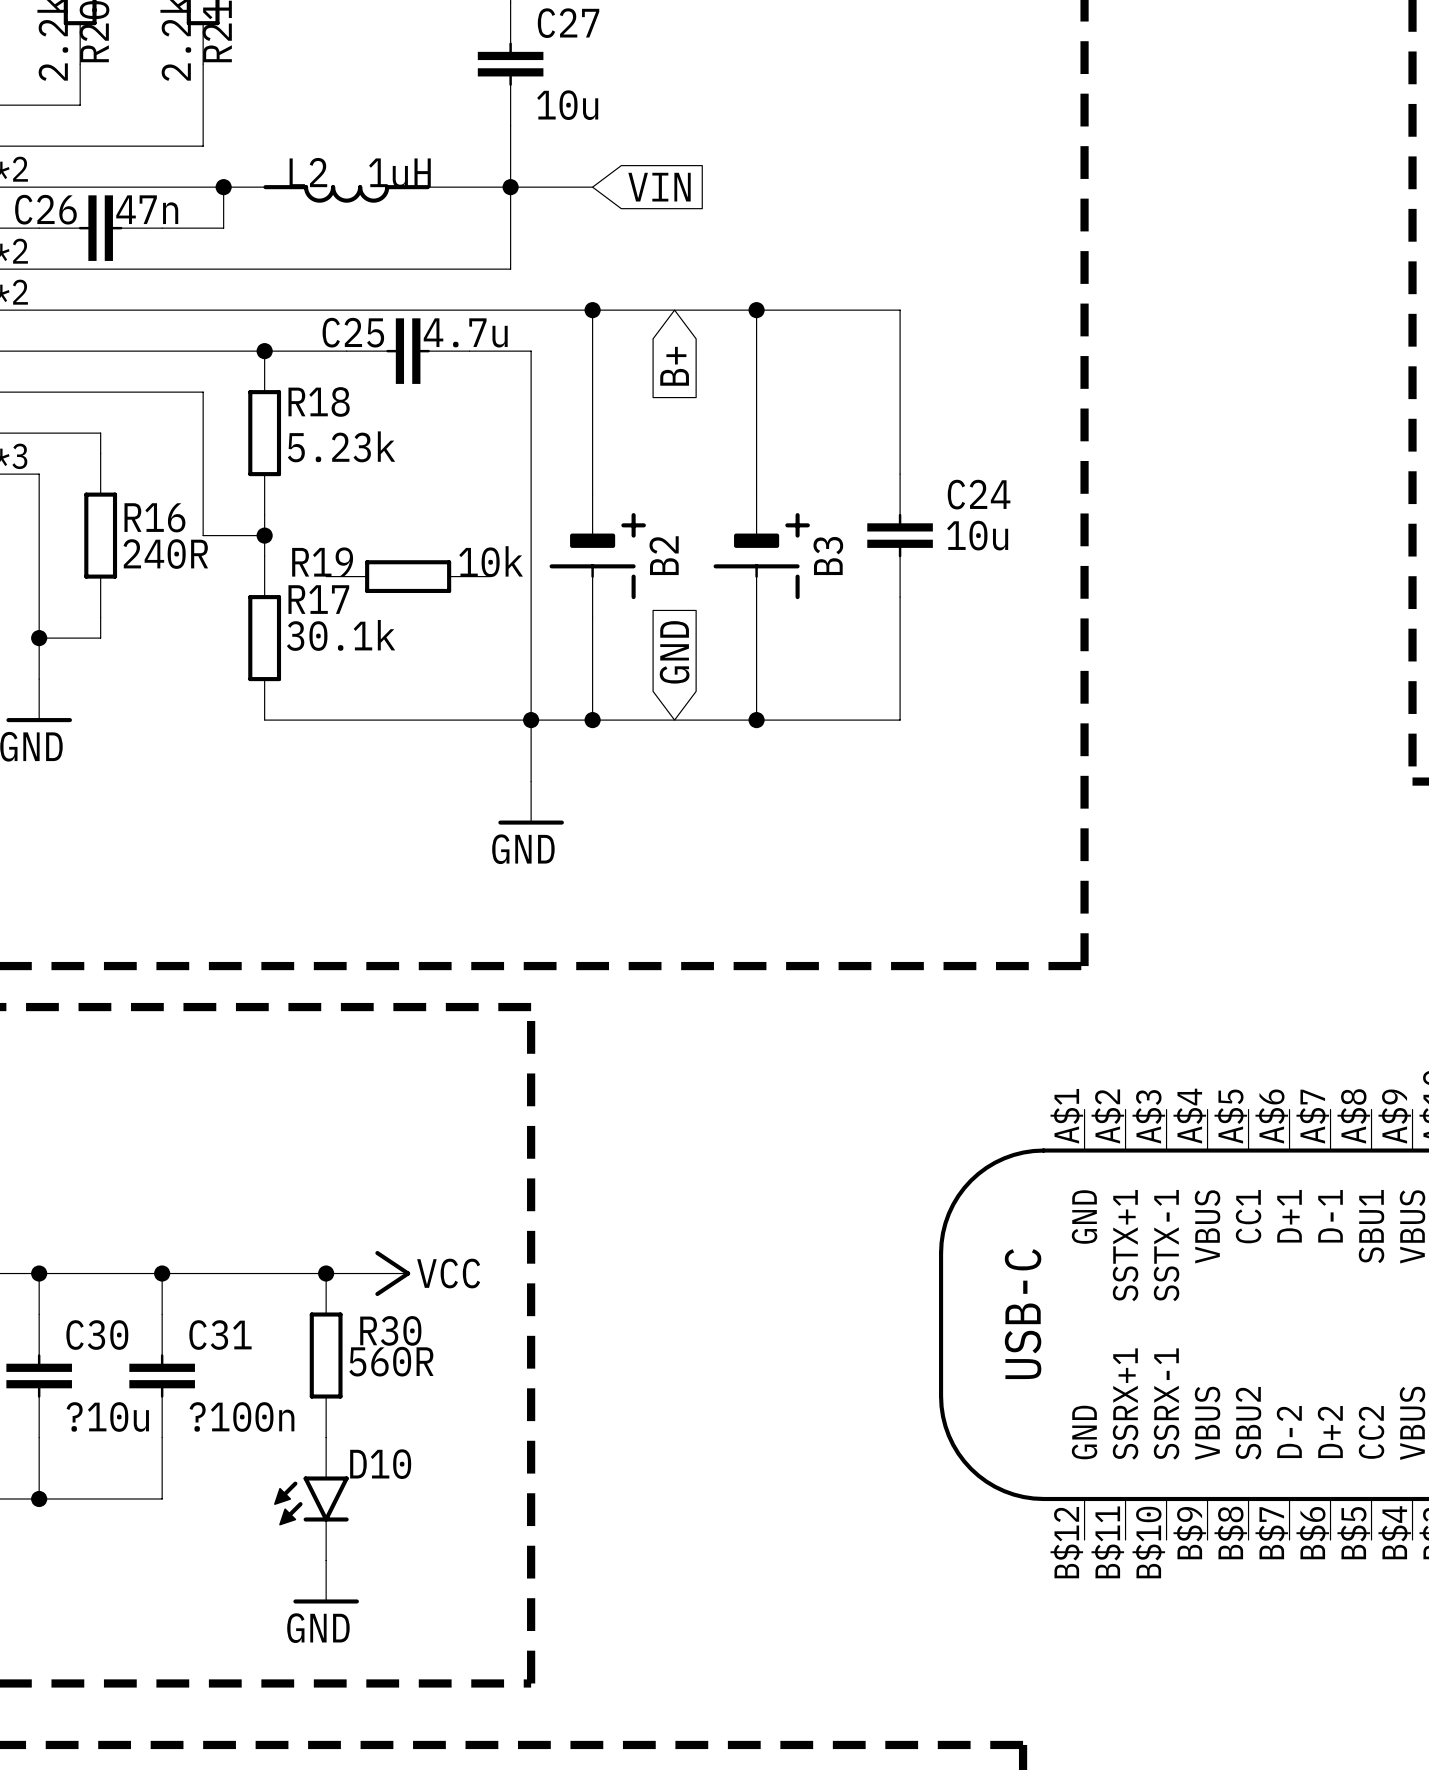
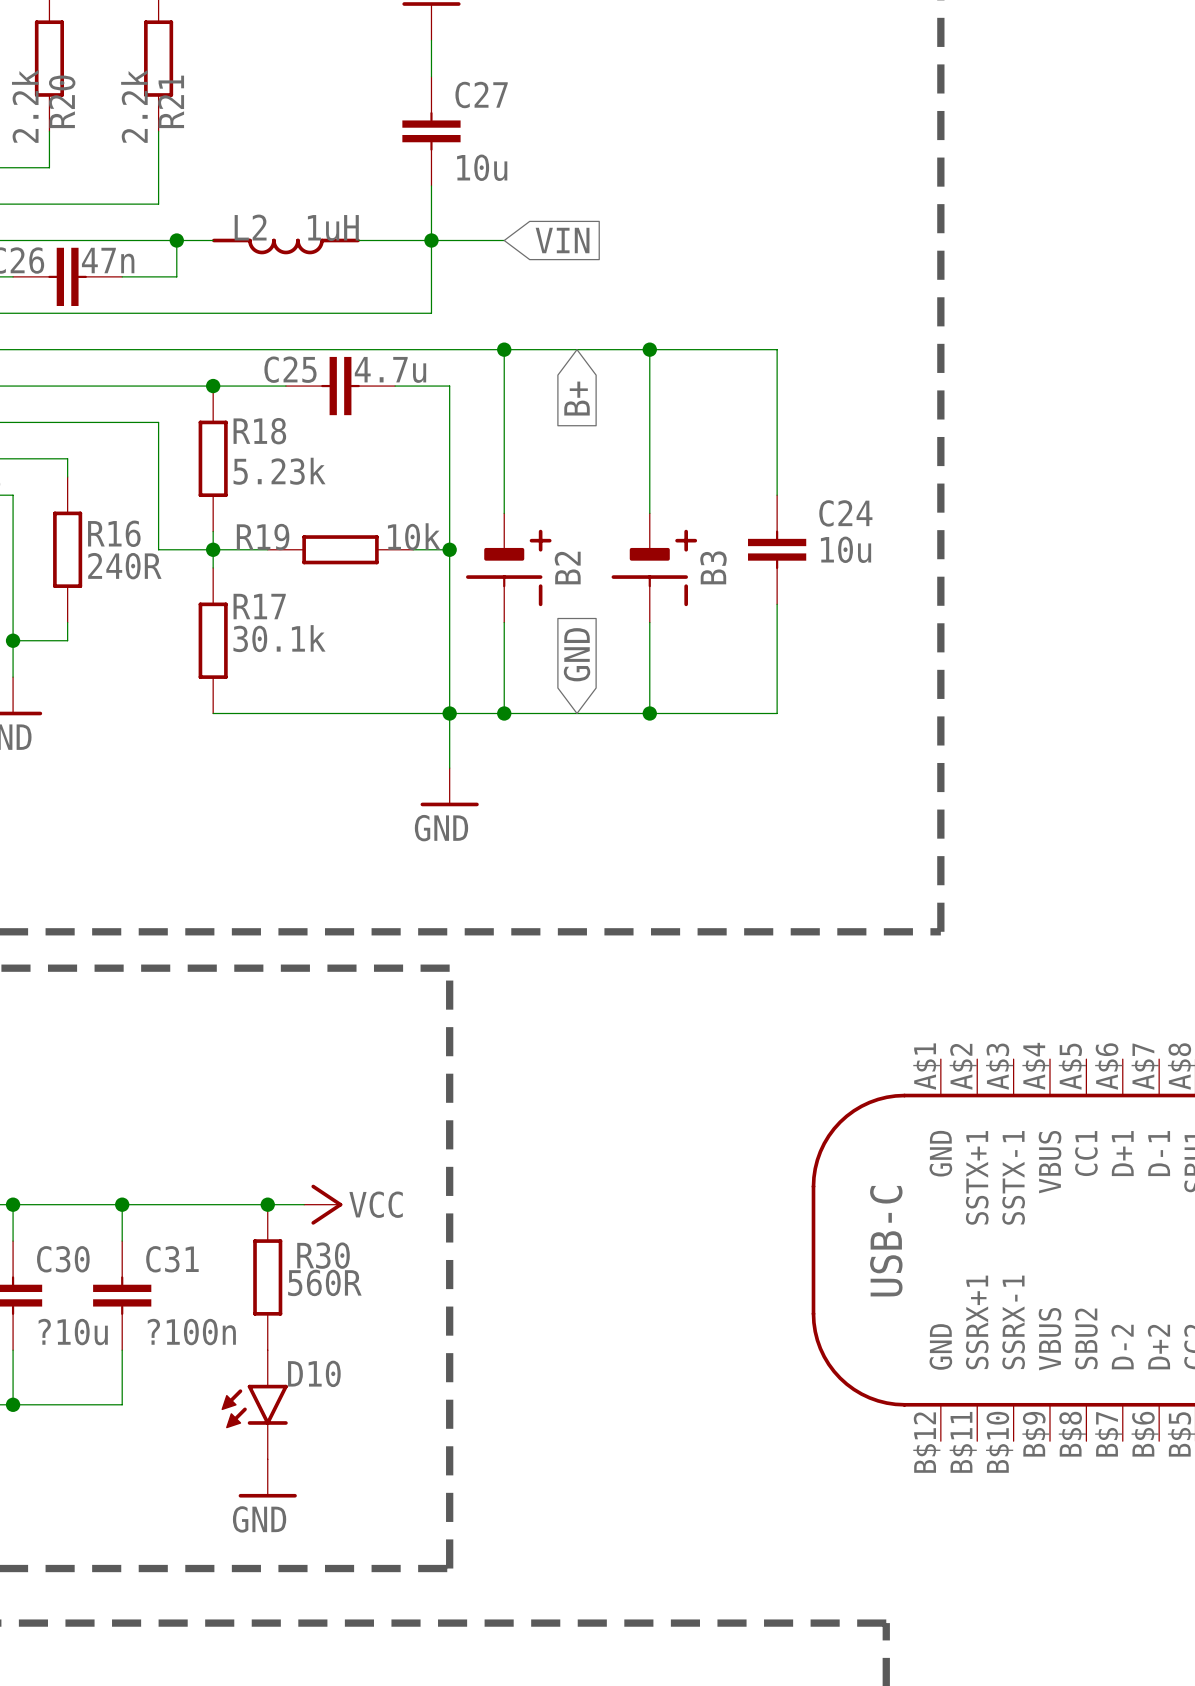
wire: none -> (213, 549) (267, 549)
wire: none -> (413, 549) (449, 549)
junction: none -> (449, 549)
R19 position: (408, 576) -> (340, 549)

